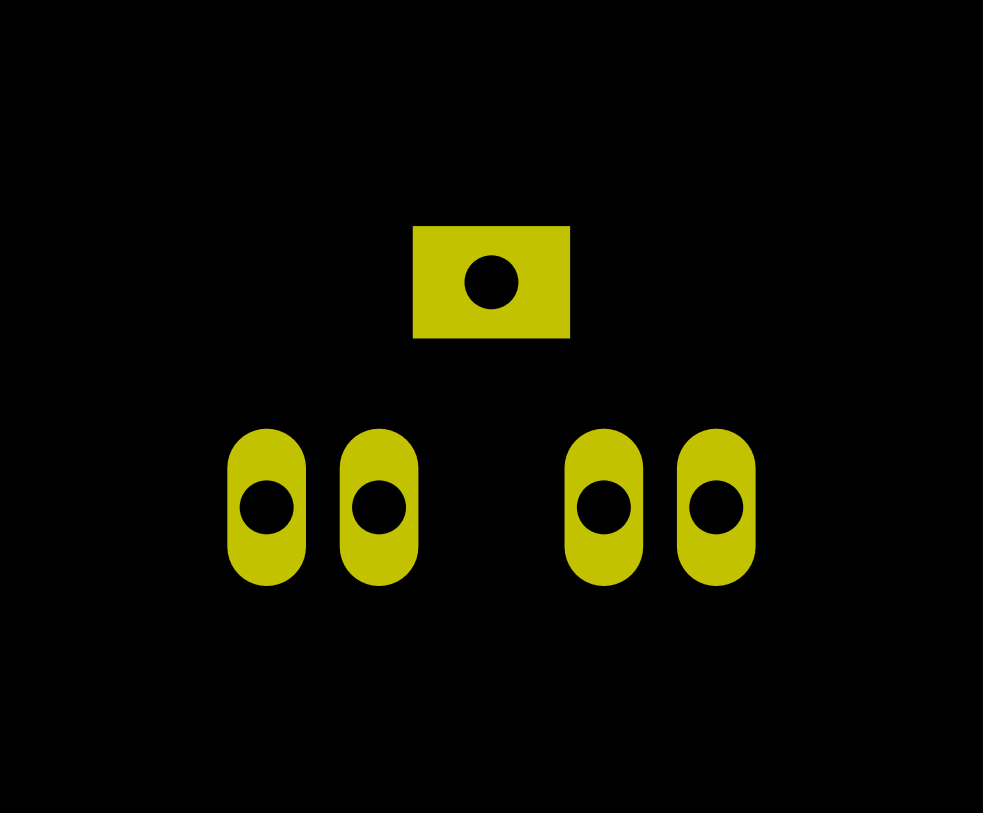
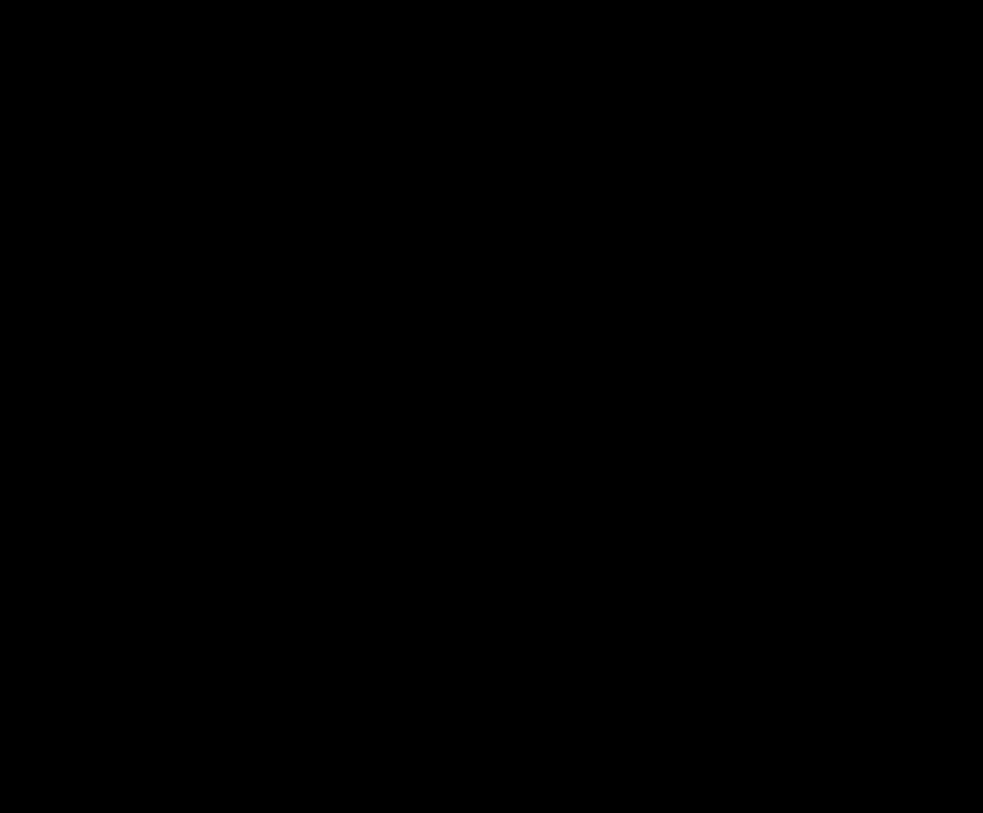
part: (491, 406) -> none

